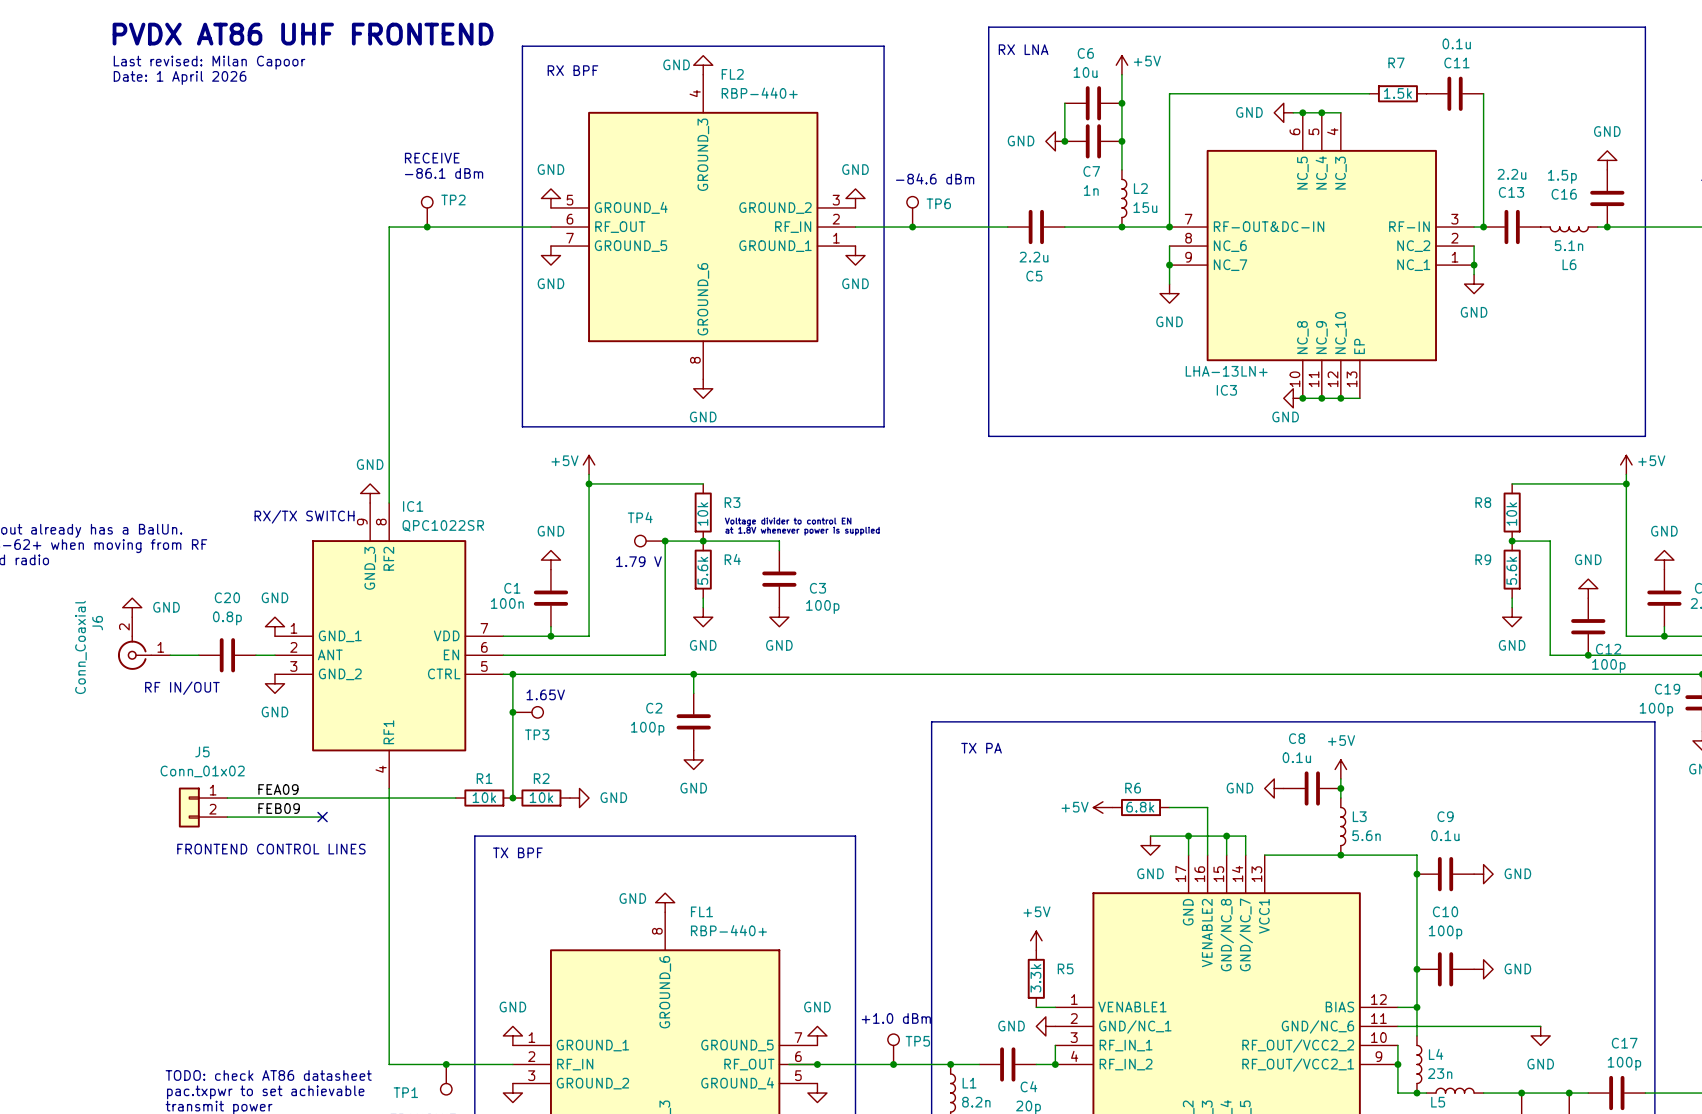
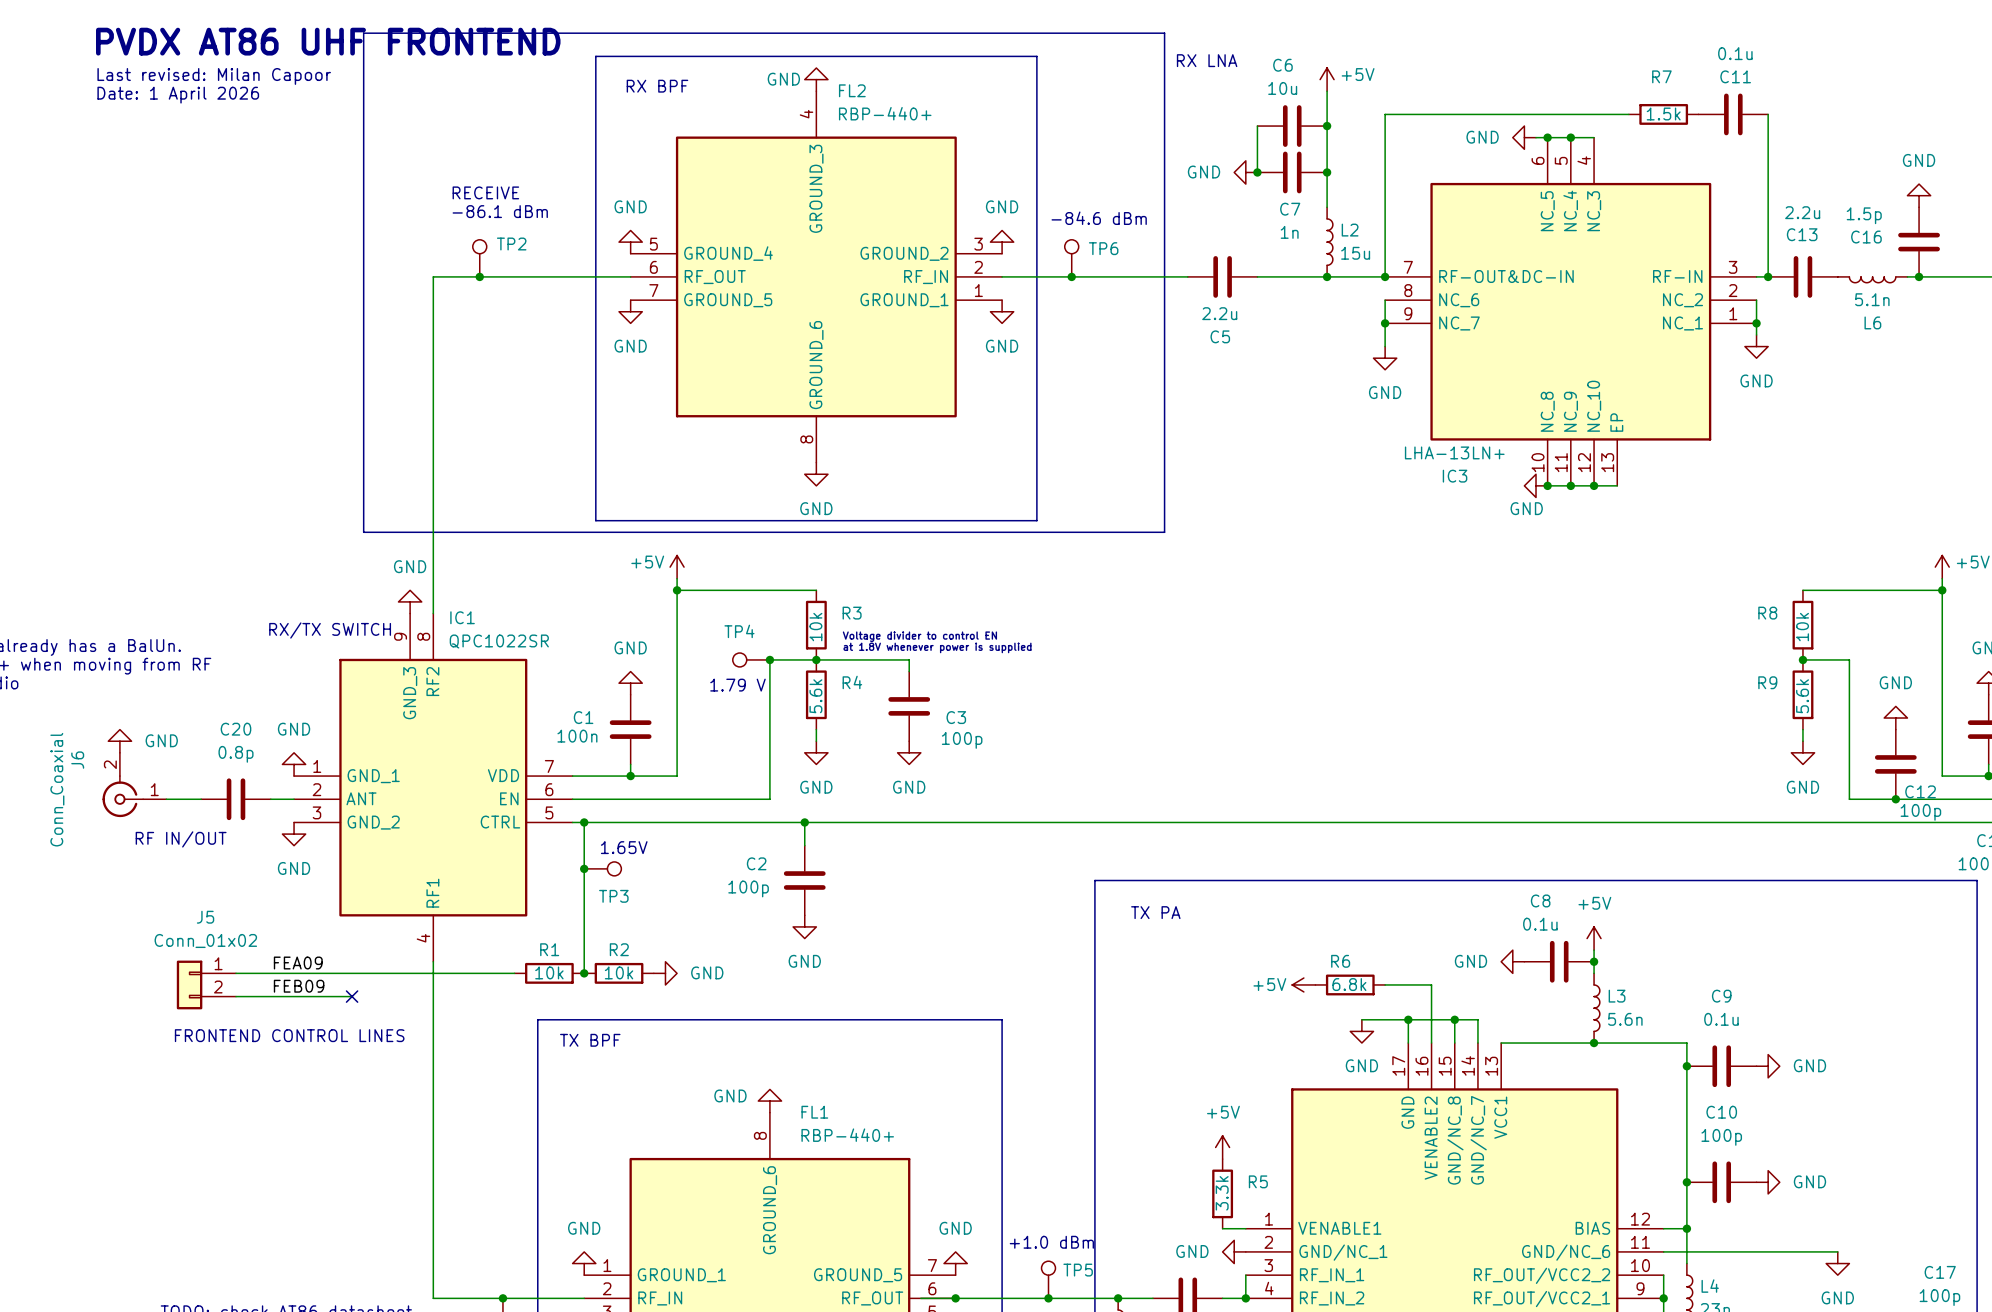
line: (988, 27) (1645, 27) (1645, 436) (988, 436) -> (1164, 33) (363, 33) (363, 532) (1164, 532)

